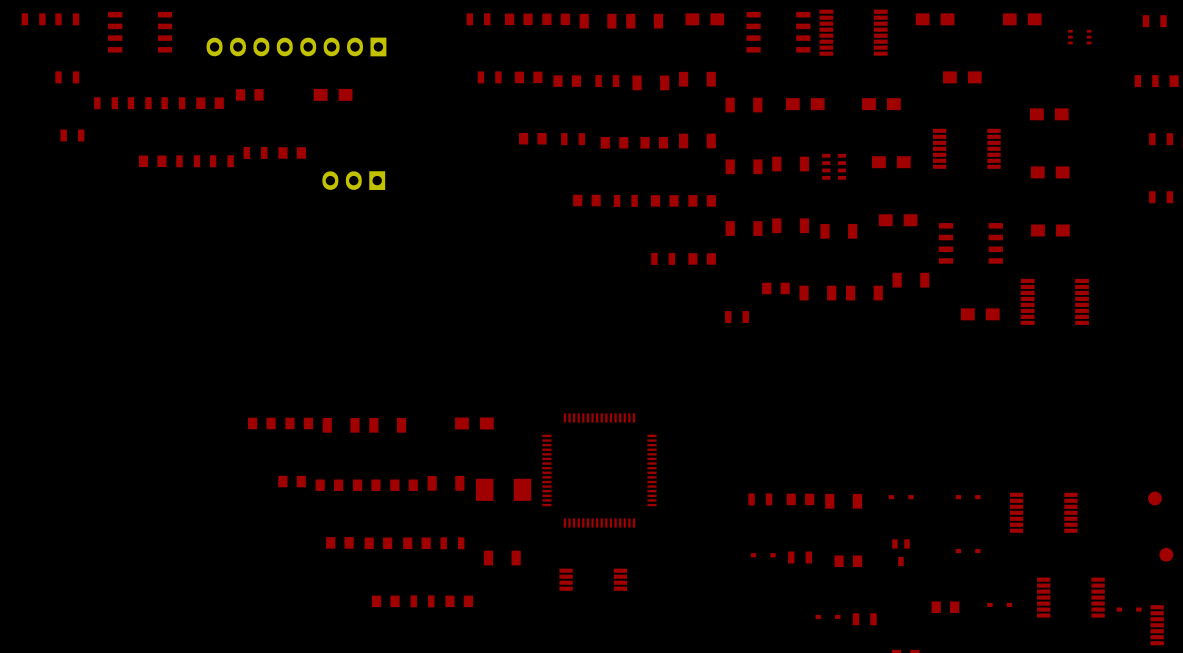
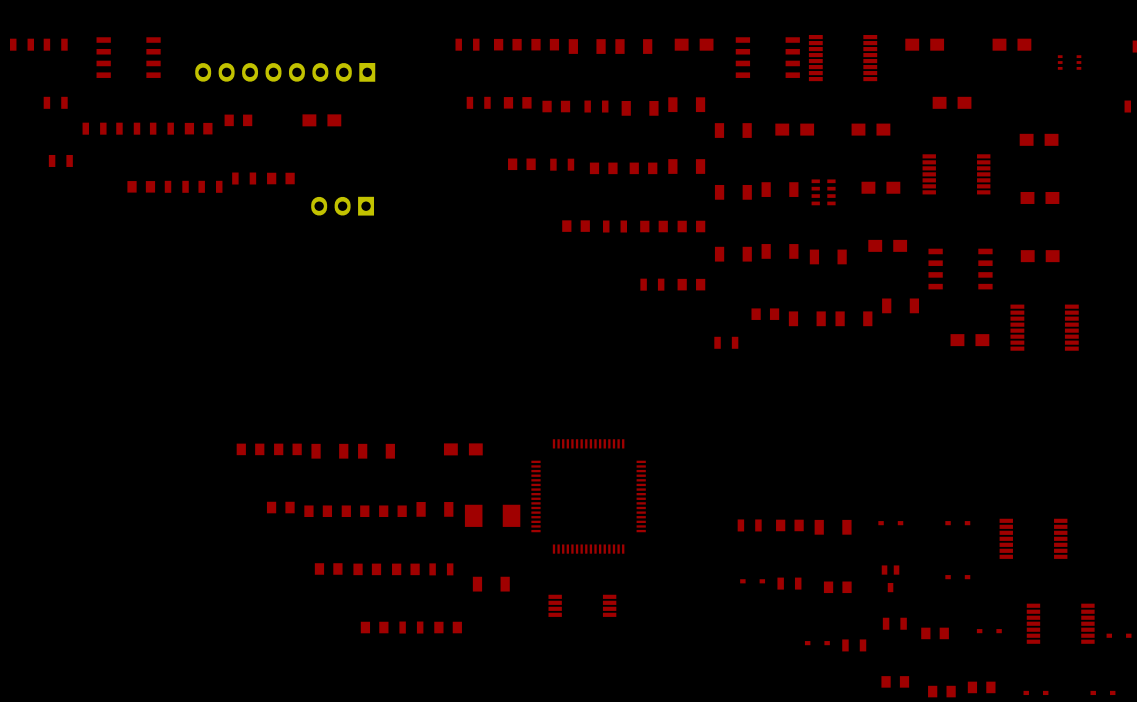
part: none -> (894, 623)

